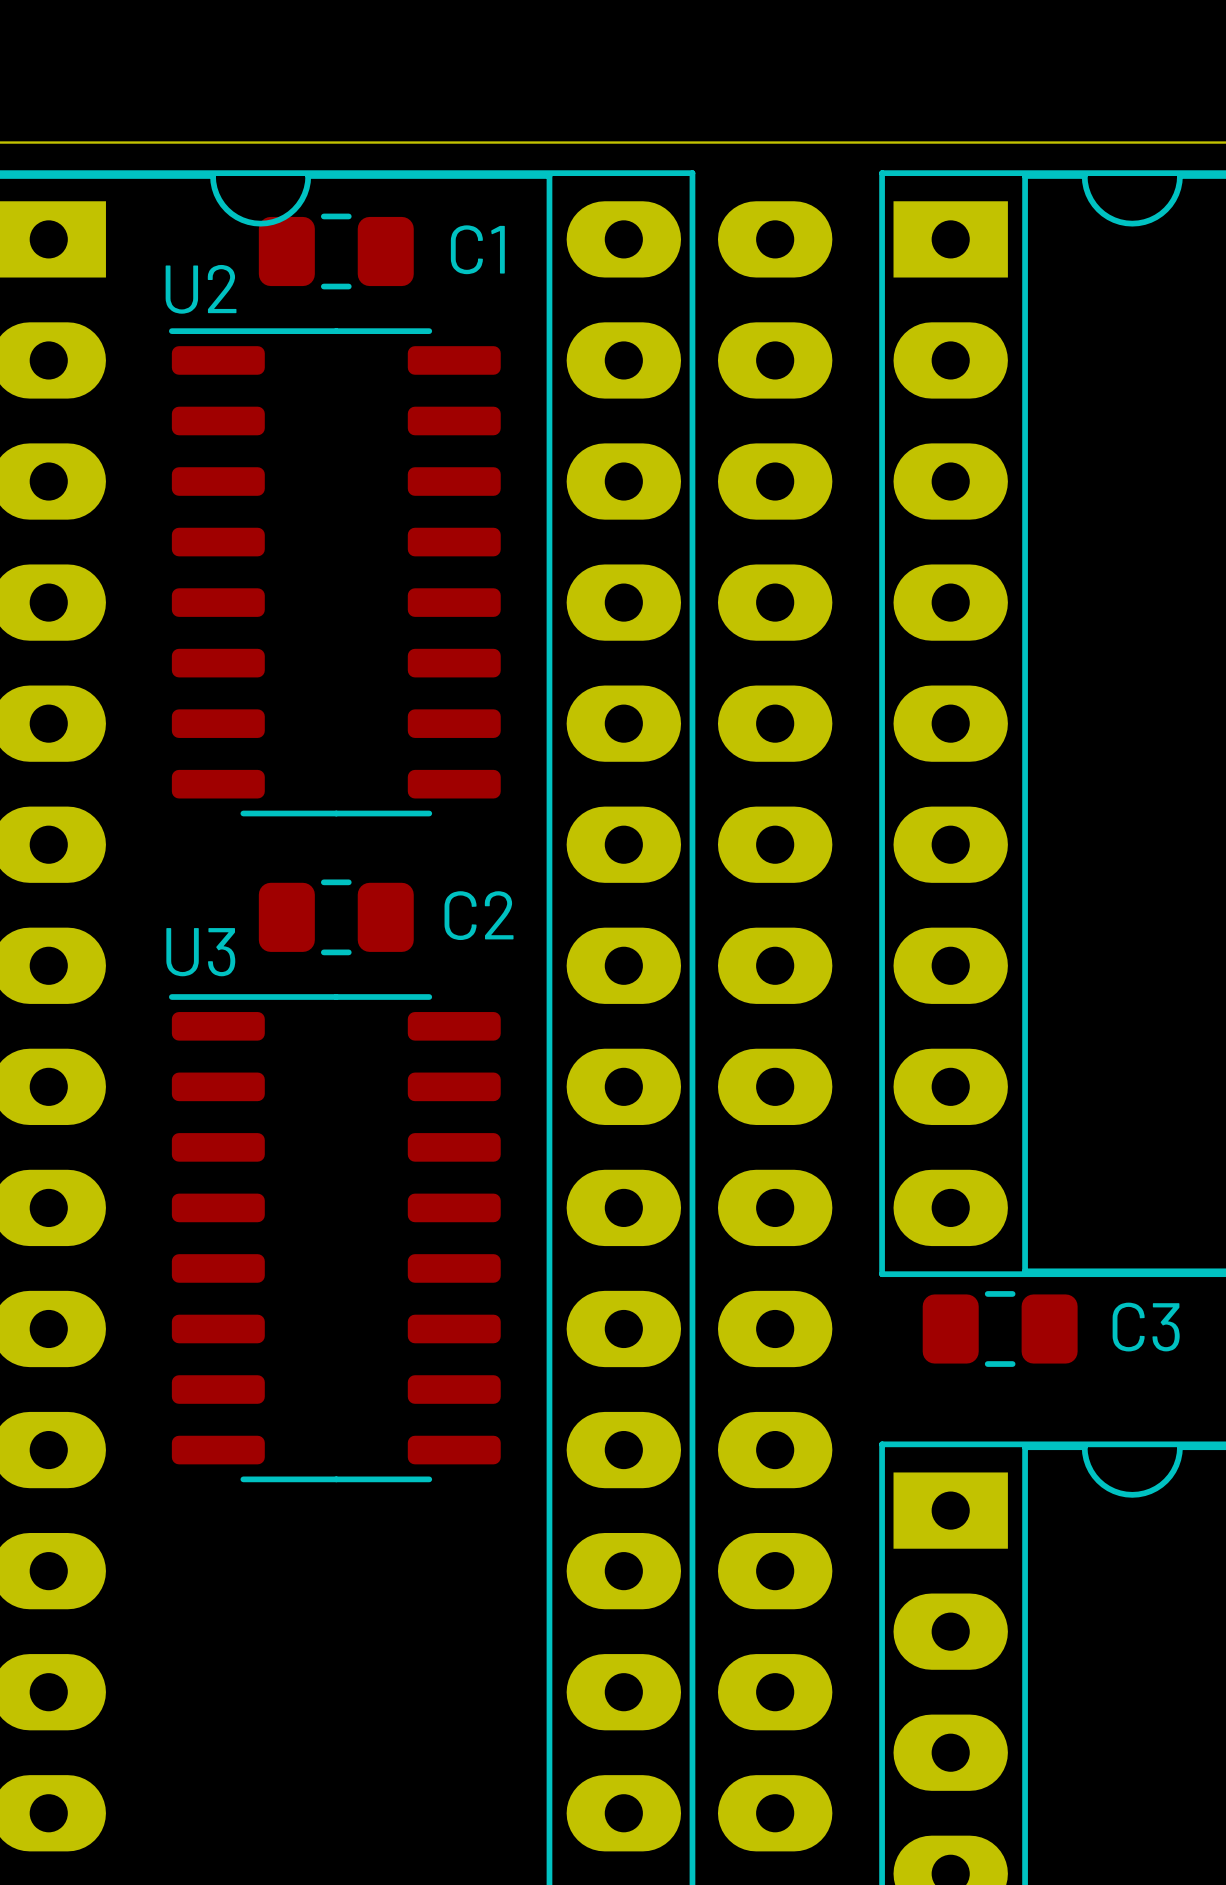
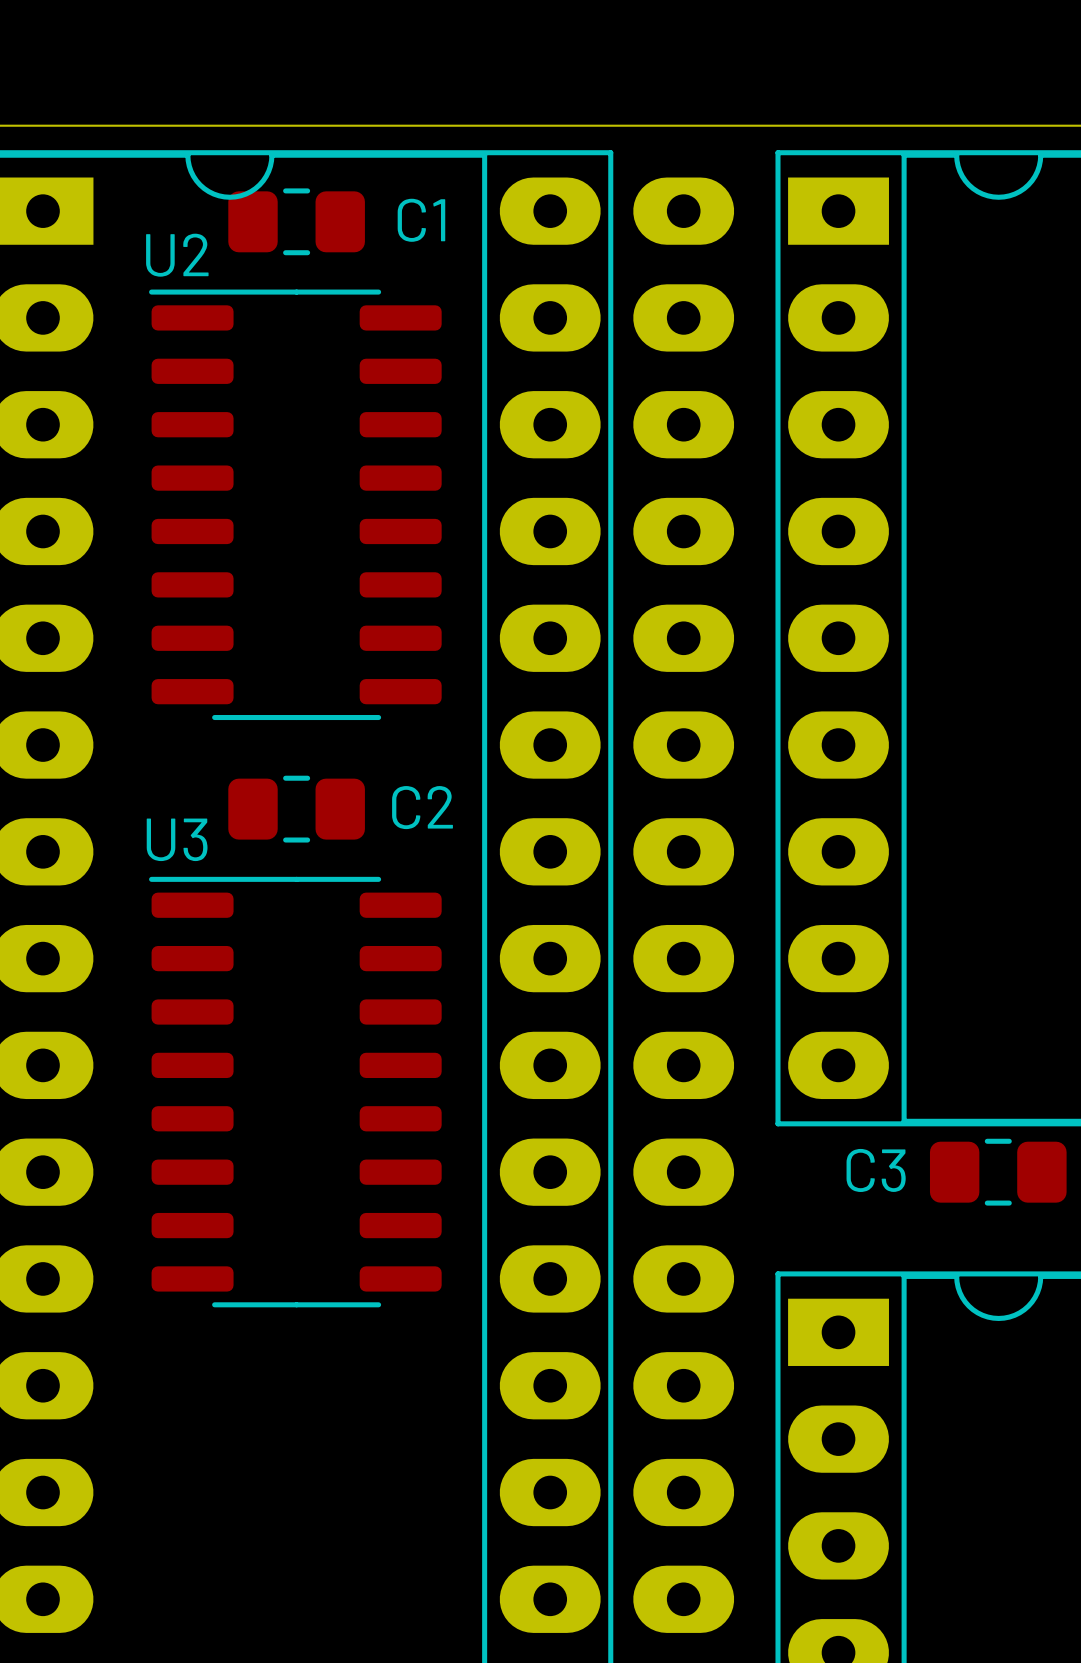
C3 name position: C3 (1146, 1327) -> C3 (876, 1170)
C3 position: (1000, 1328) -> (998, 1172)

